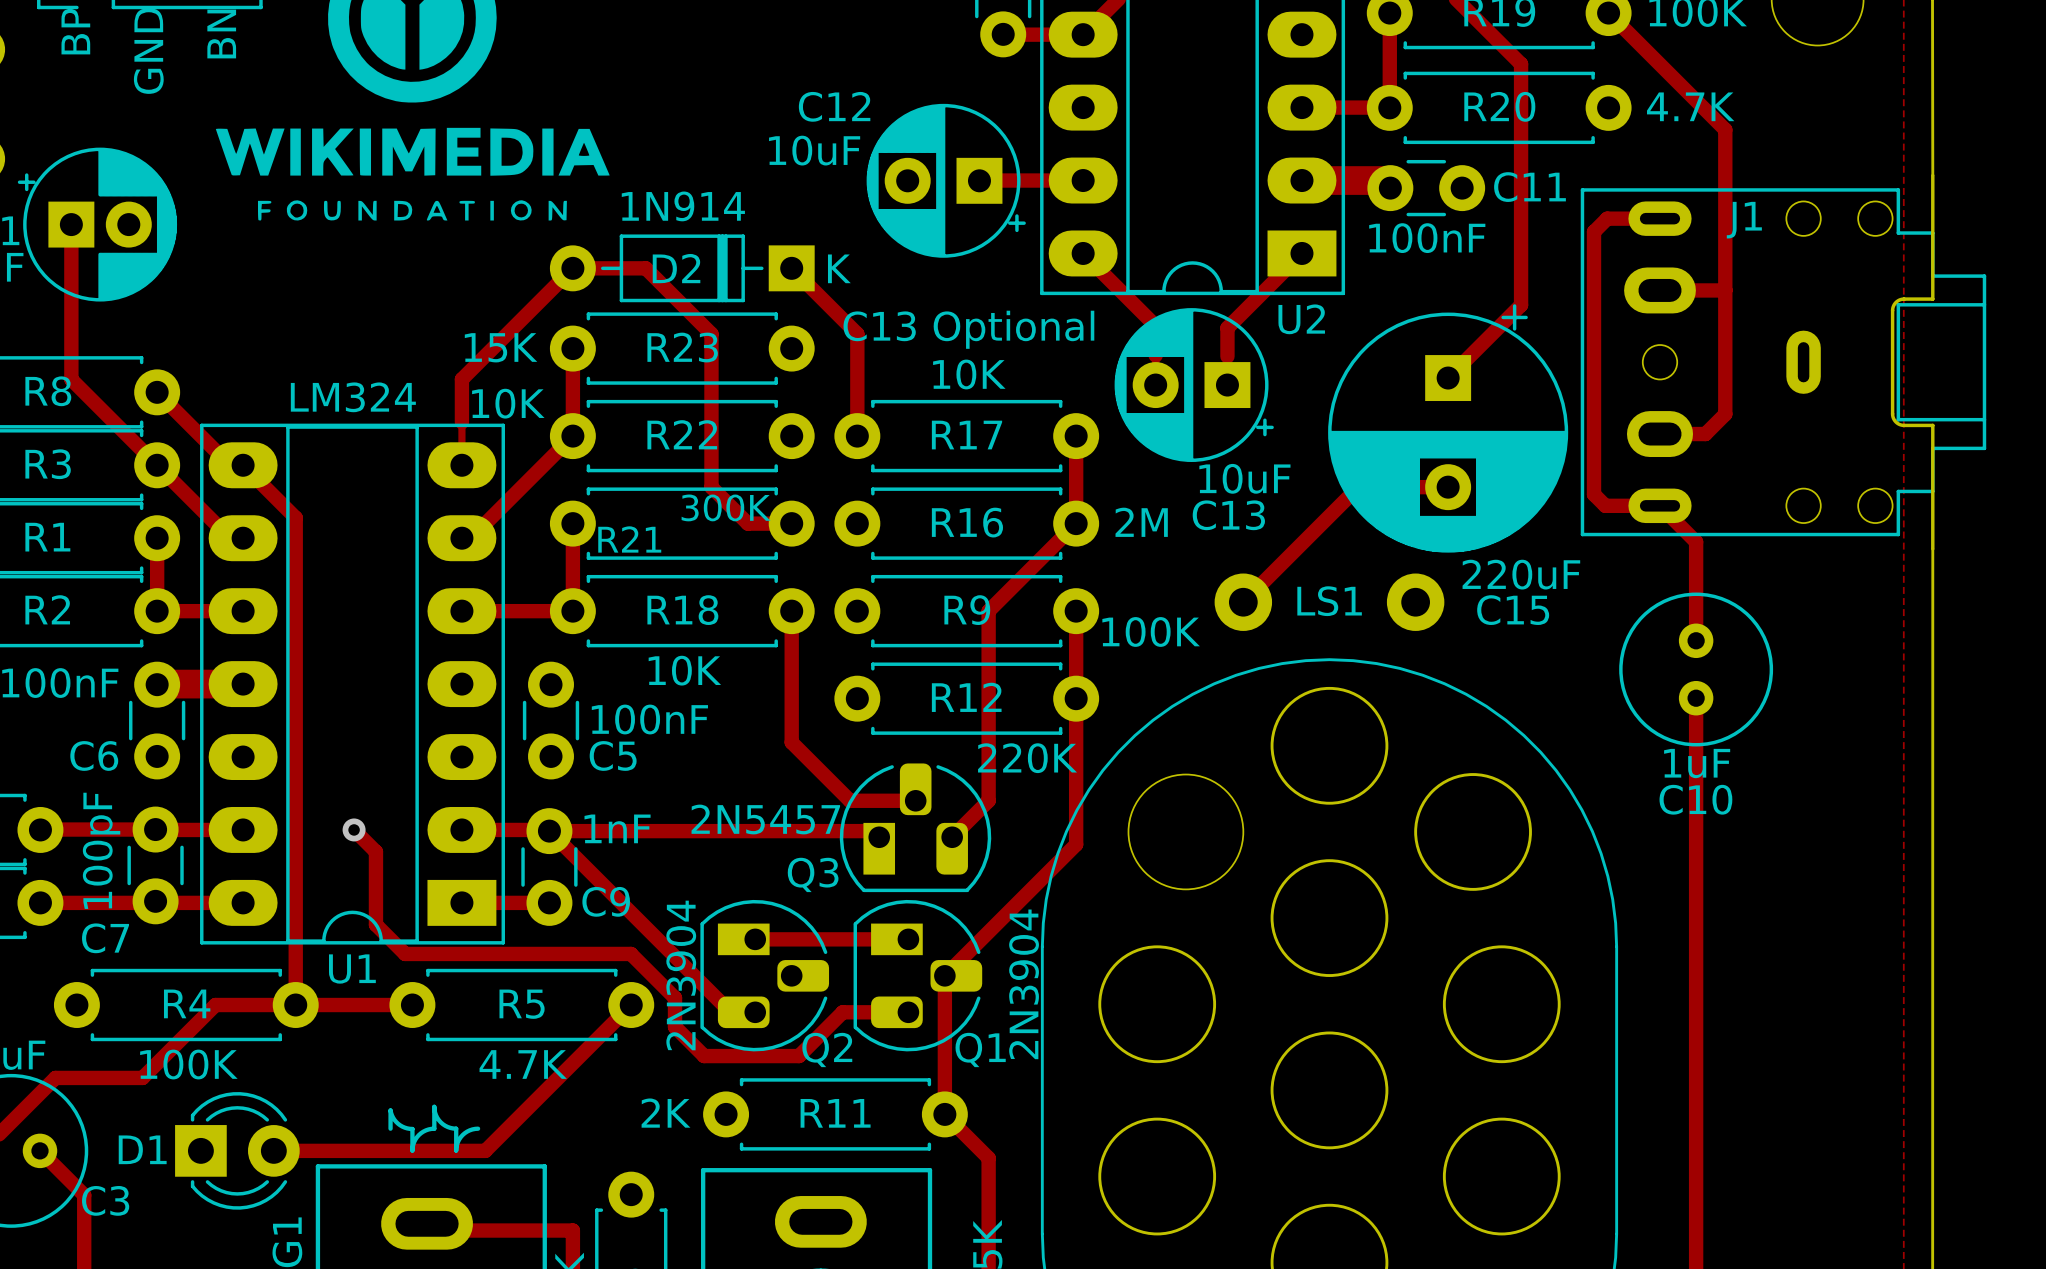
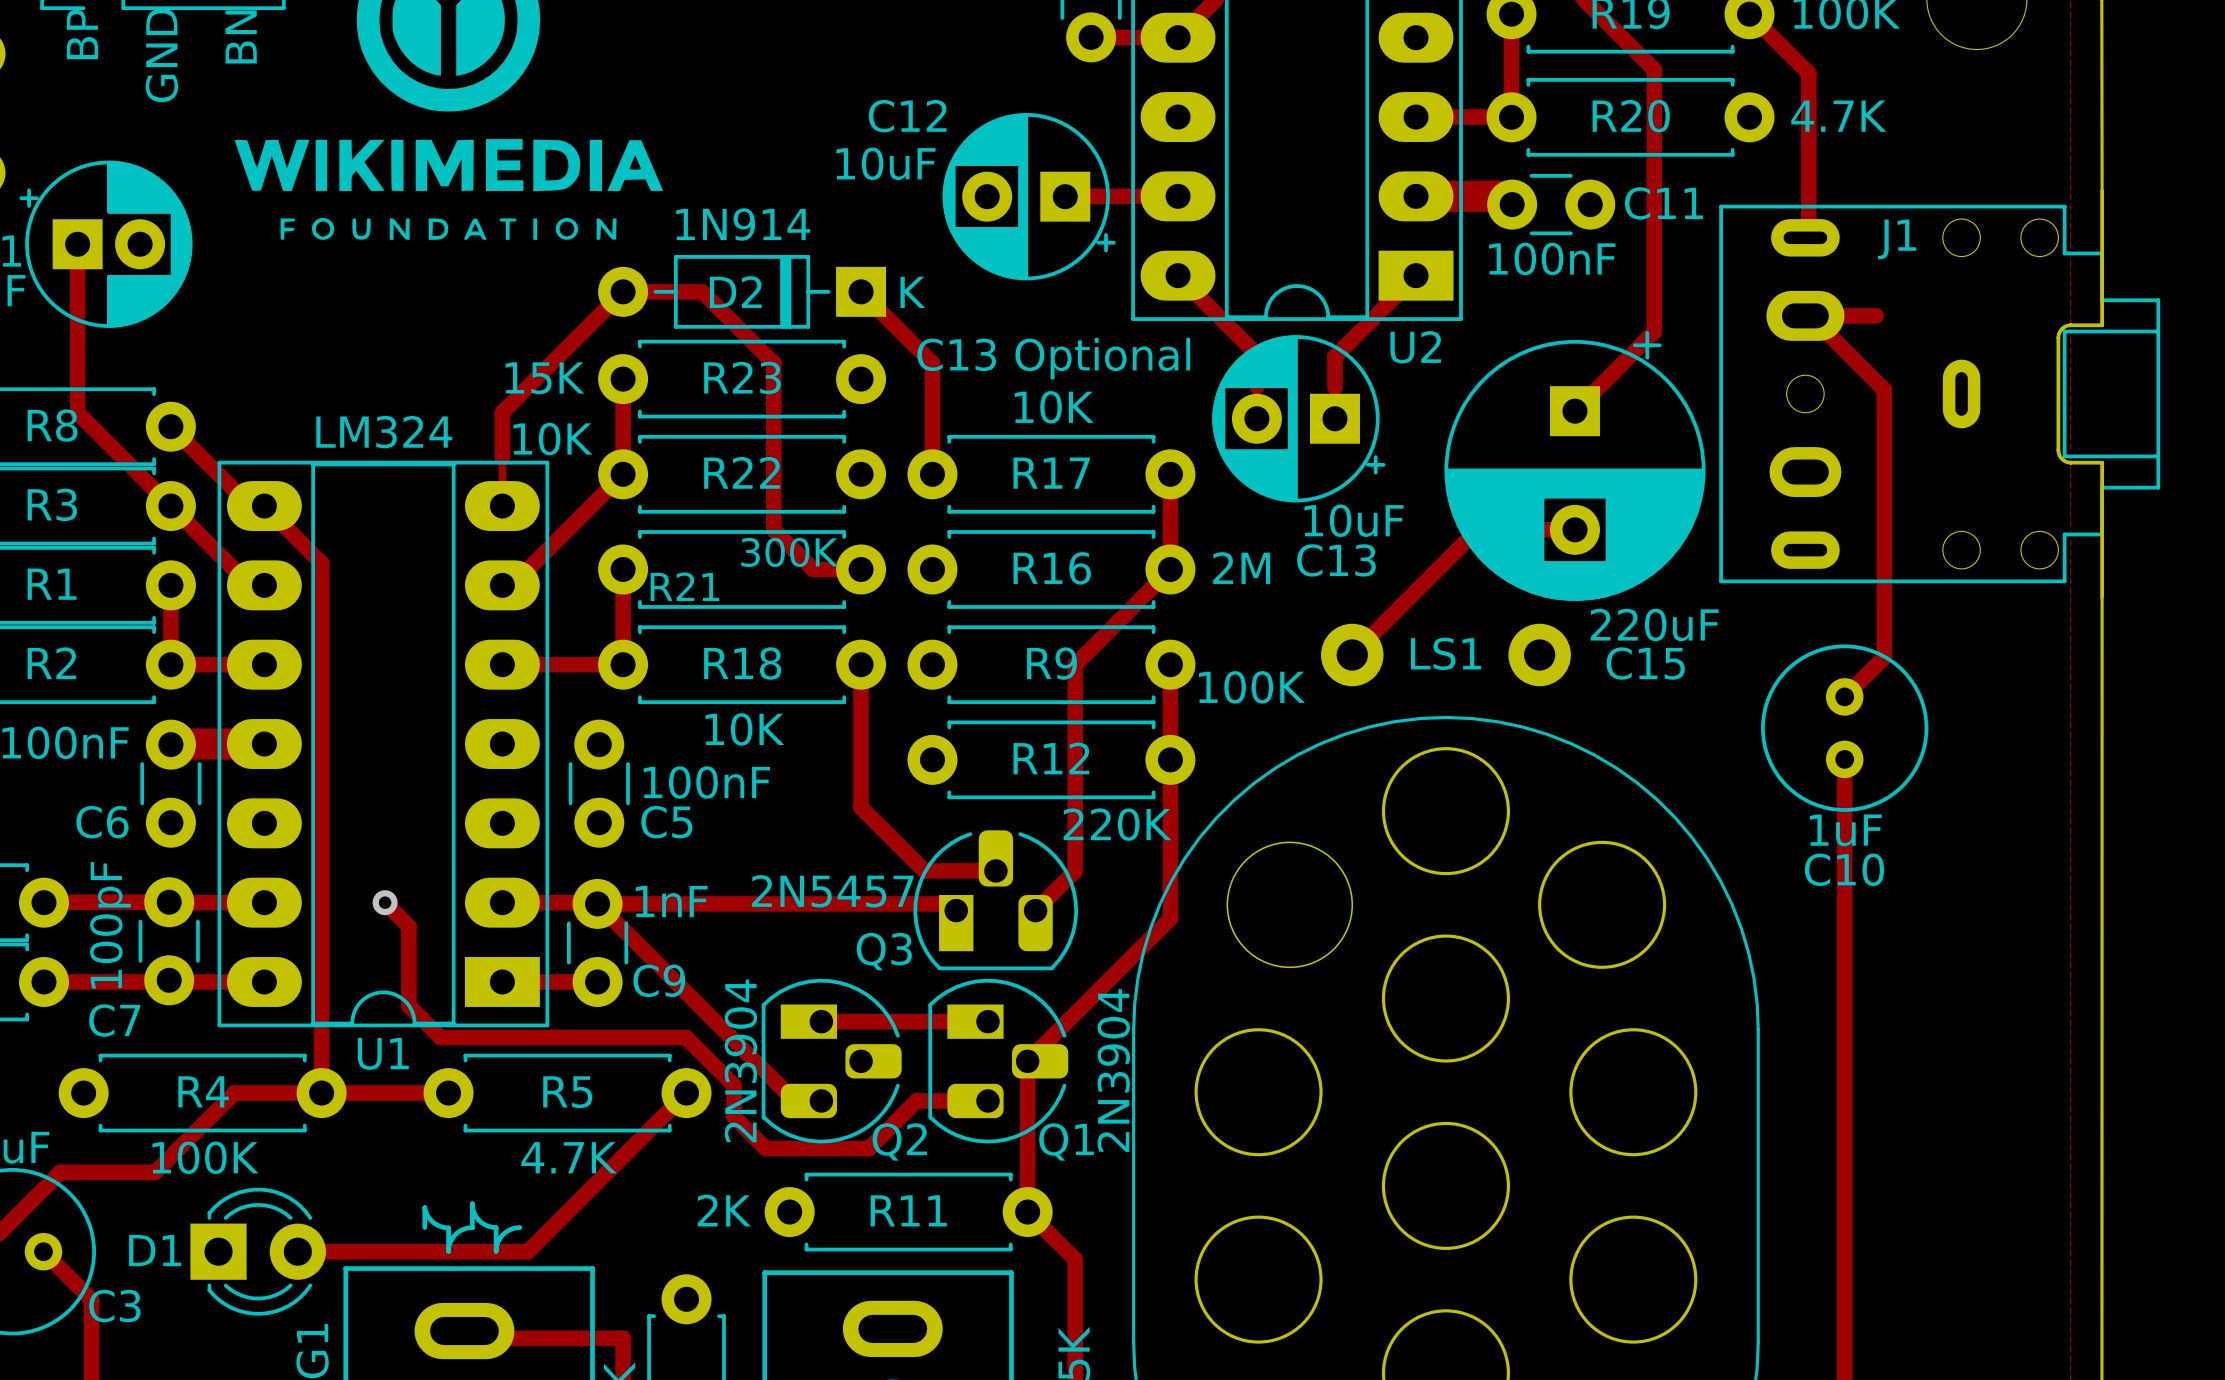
track: (1663, 67) (1725, 129) (1725, 414) (1705, 434) (1660, 434) -> (1808, 73) (1808, 236)
track: (1660, 218) (1607, 218) (1594, 231) (1594, 494) (1605, 505) (1660, 505) (1696, 541) (1696, 640) -> (1808, 314) (1884, 389) (1884, 657) (1844, 696)

